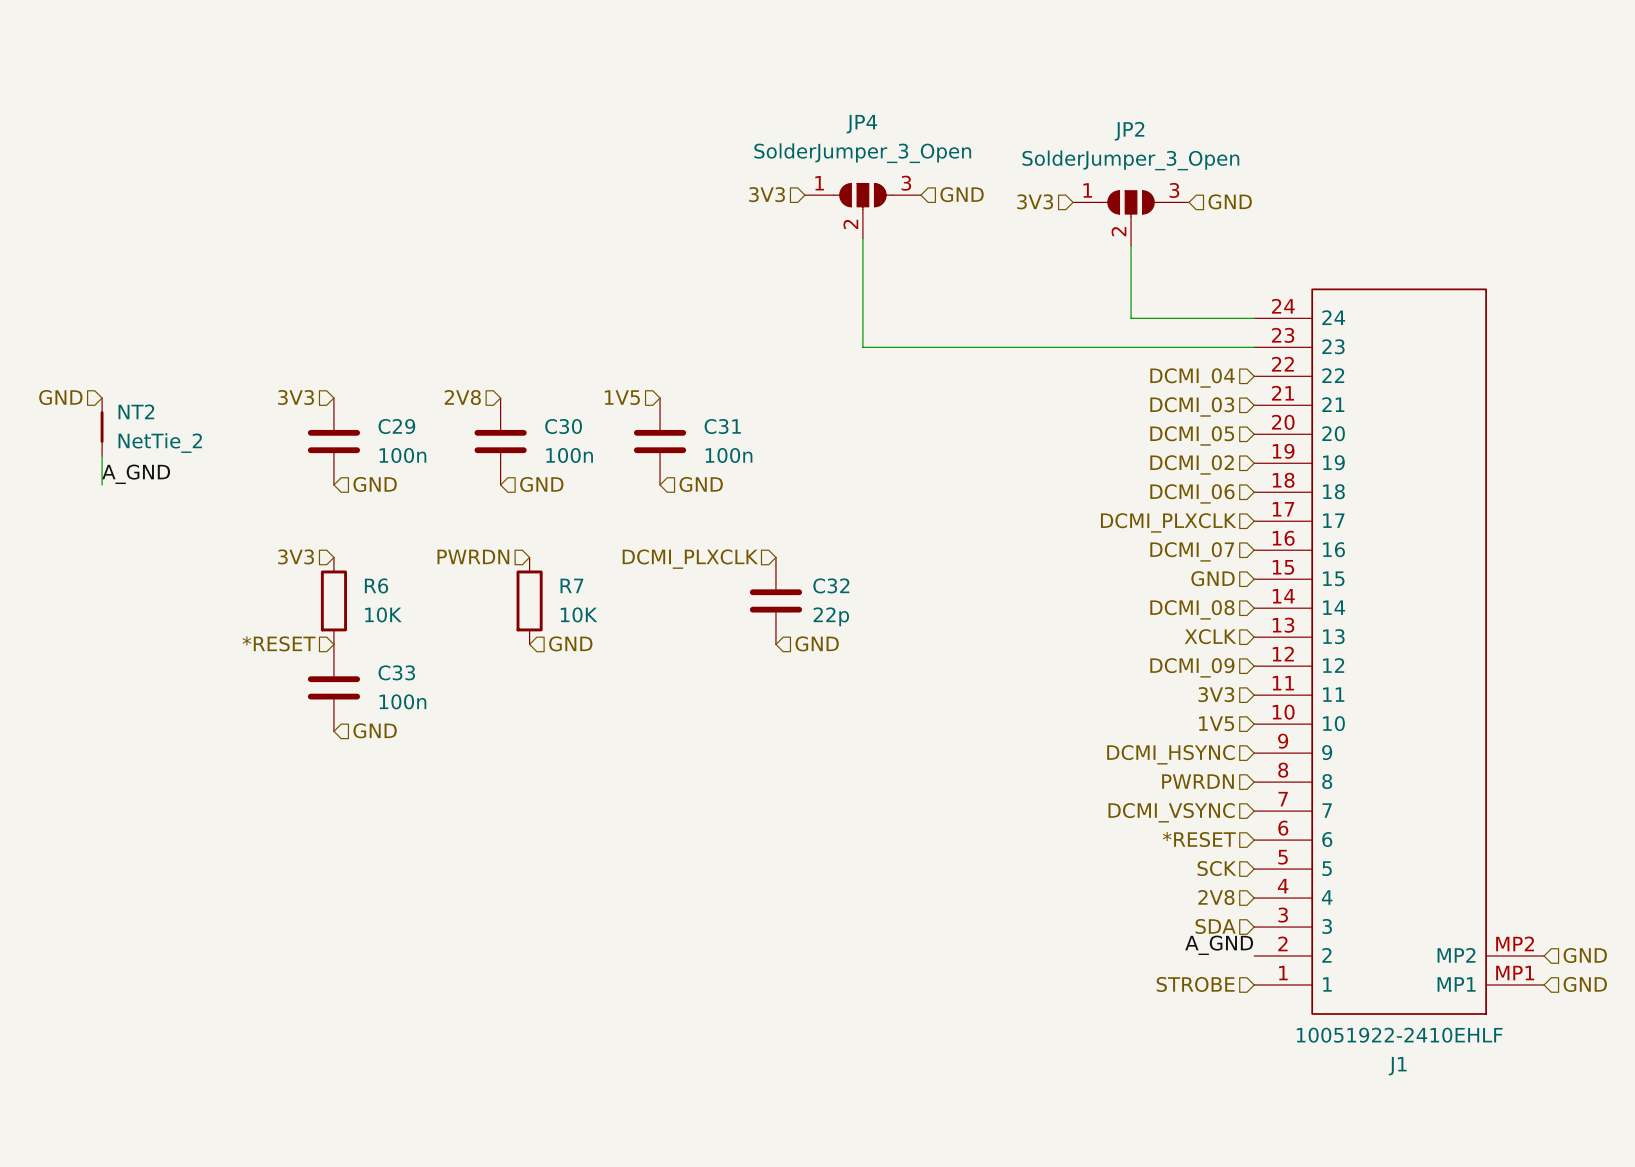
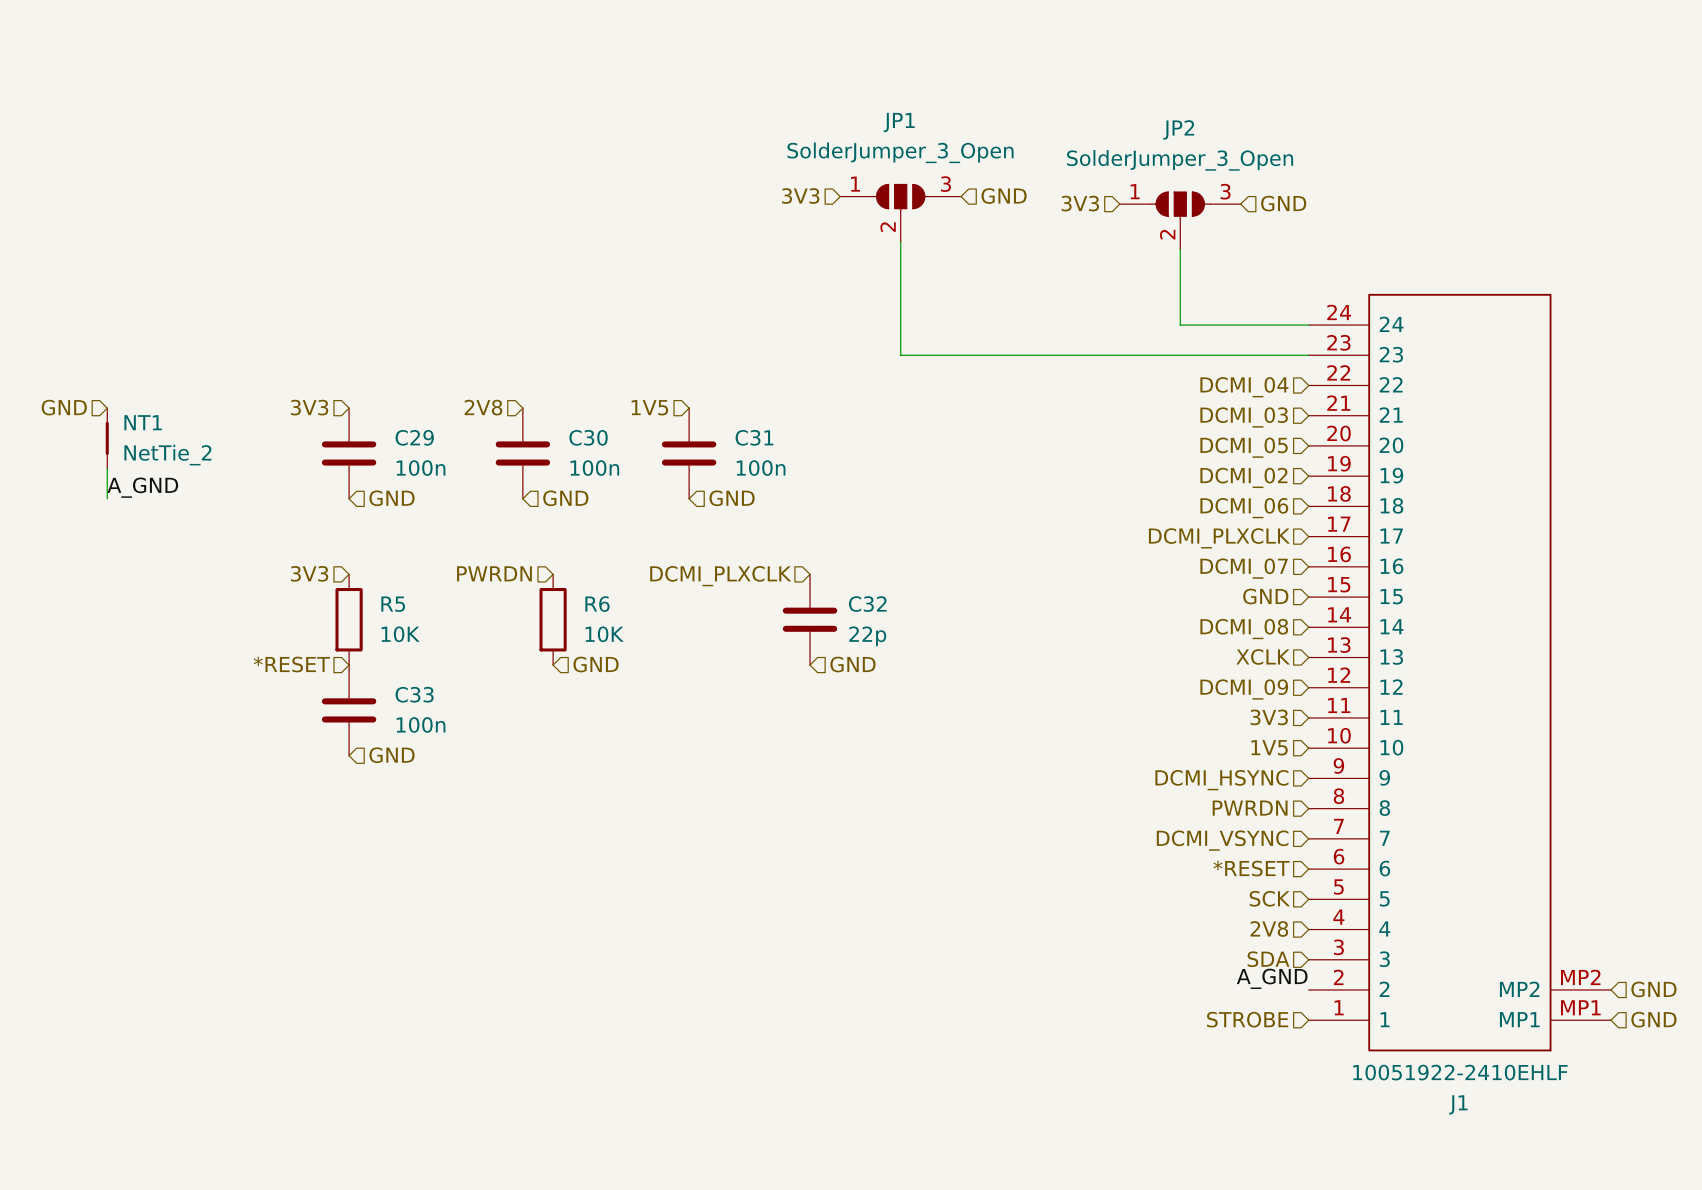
JP4 name: JP4 (861, 124) -> JP1 (899, 122)
NT2 name: NT2 (136, 411) -> NT1 (143, 422)
R6 name: R6 (376, 585) -> R5 (393, 604)
R7 name: R7 (571, 585) -> R6 (597, 604)

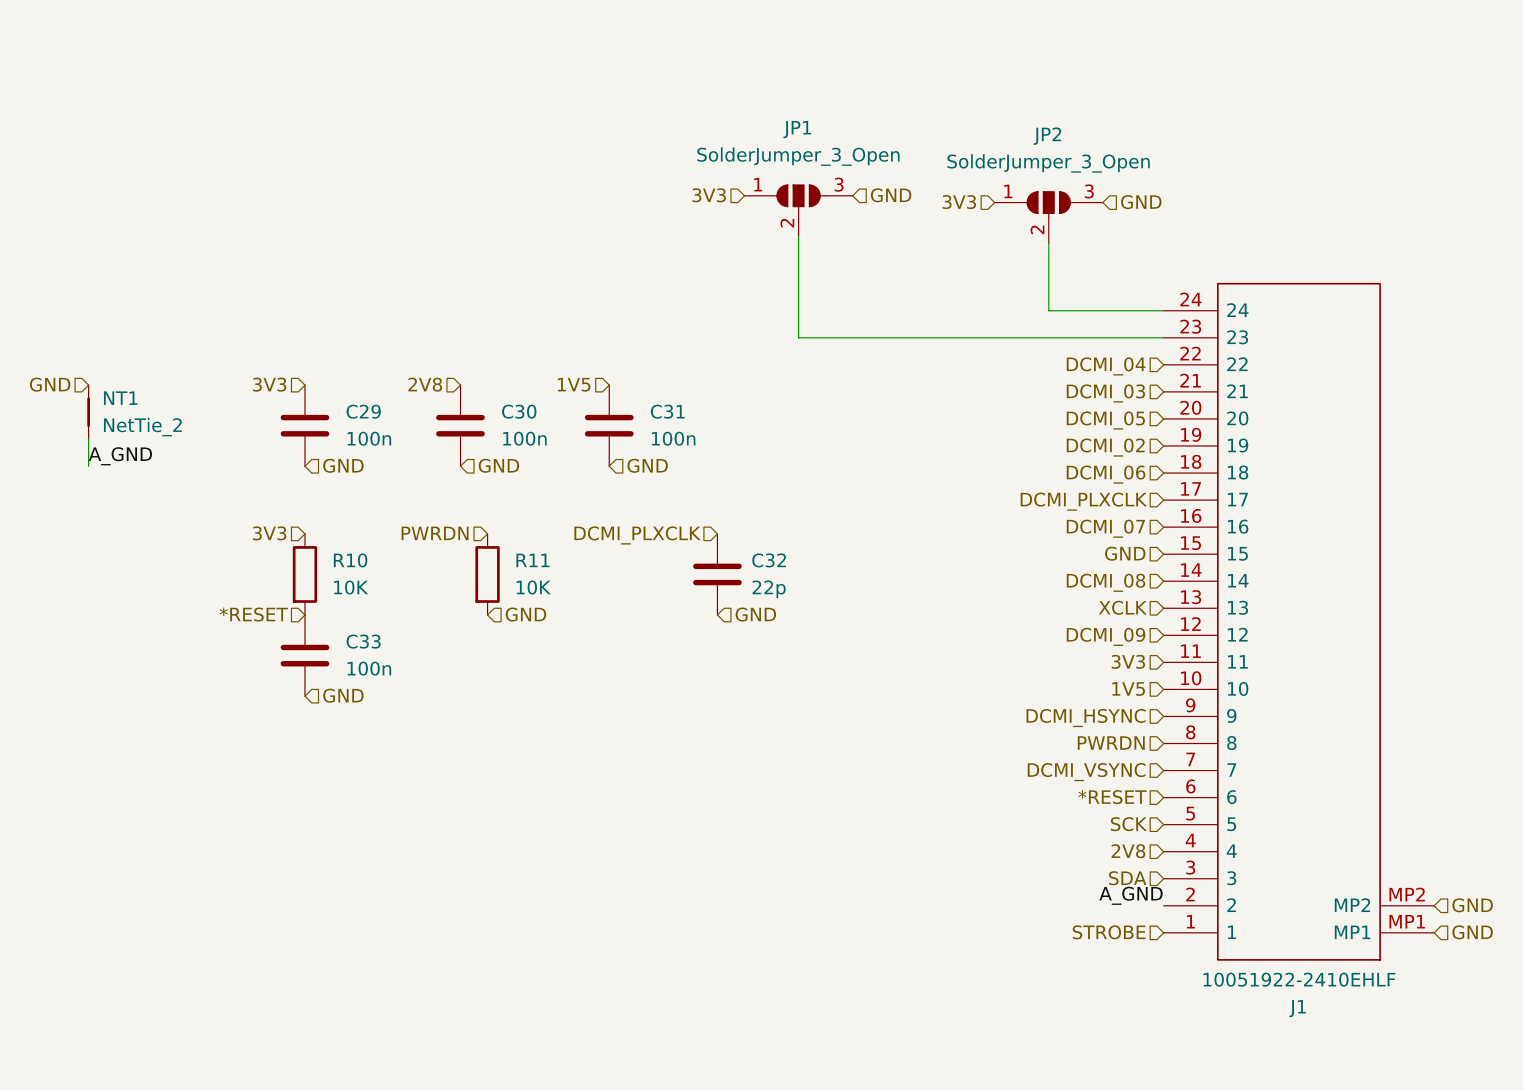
R5 name: R5 (393, 604) -> R10 (350, 560)
R6 name: R6 (597, 604) -> R11 (532, 560)

